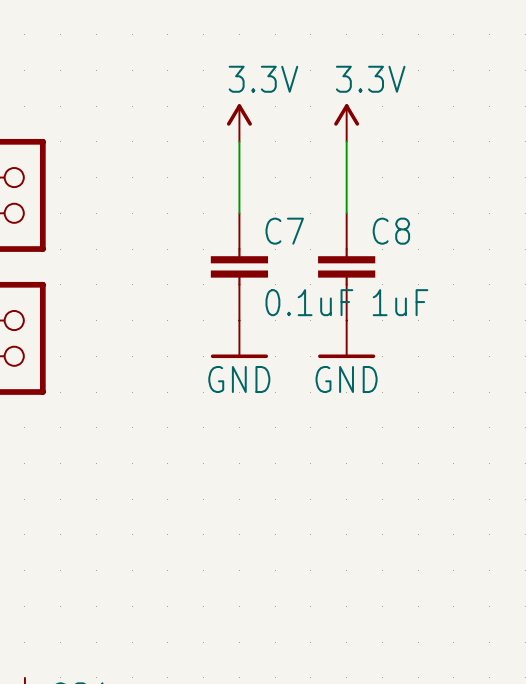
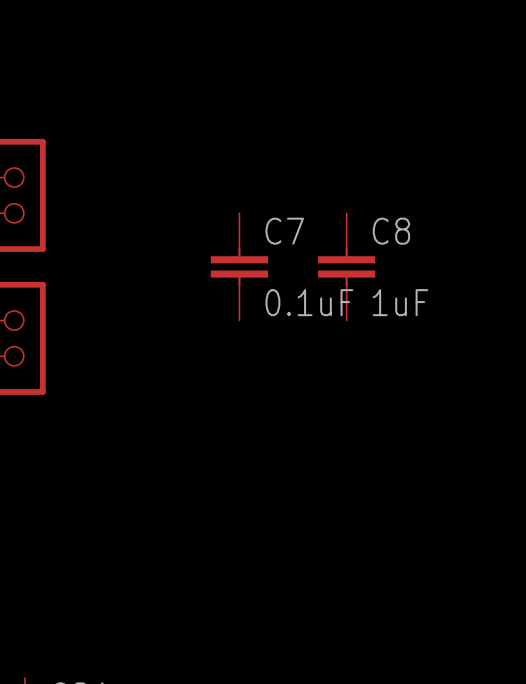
power symbol: 3.3V (239, 123) -> none
power symbol: 3.3V (346, 123) -> none
wire: (239, 141) (239, 213) -> none
wire: (346, 141) (346, 213) -> none
power symbol: GND (239, 339) -> none
power symbol: GND (346, 339) -> none

